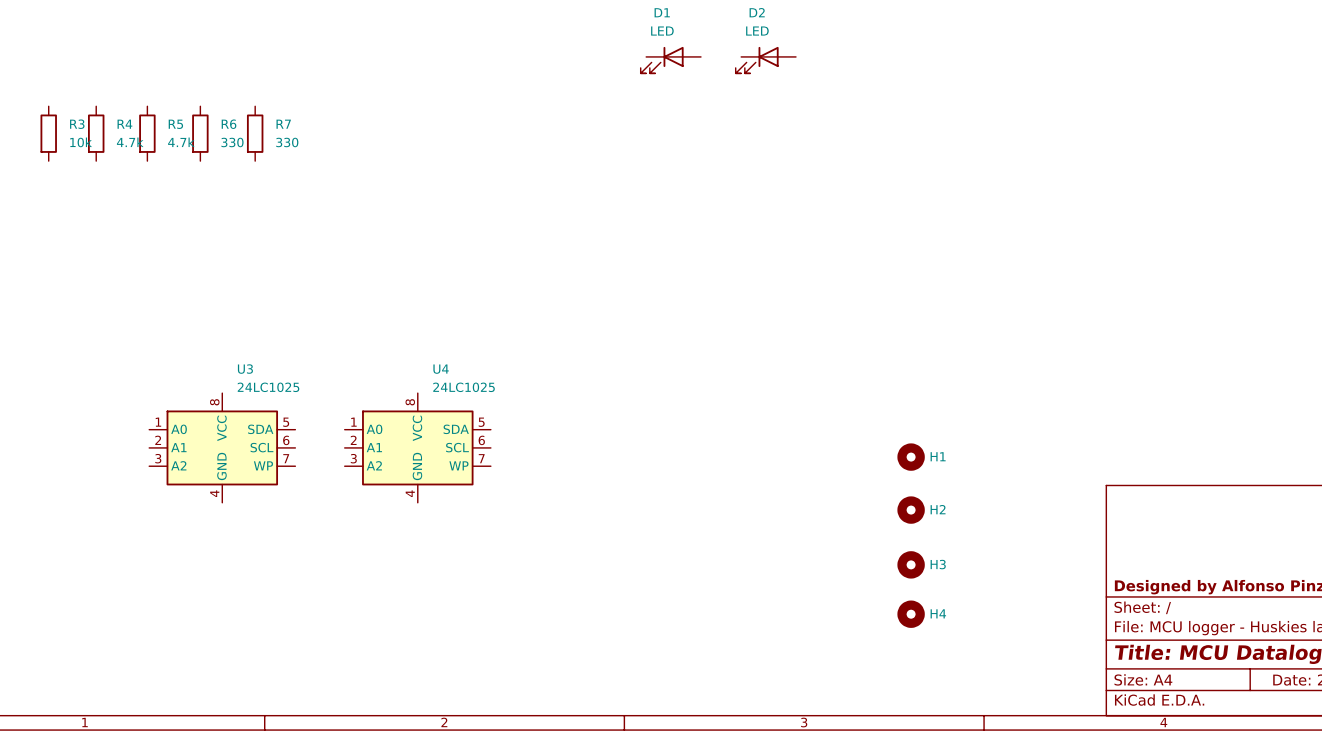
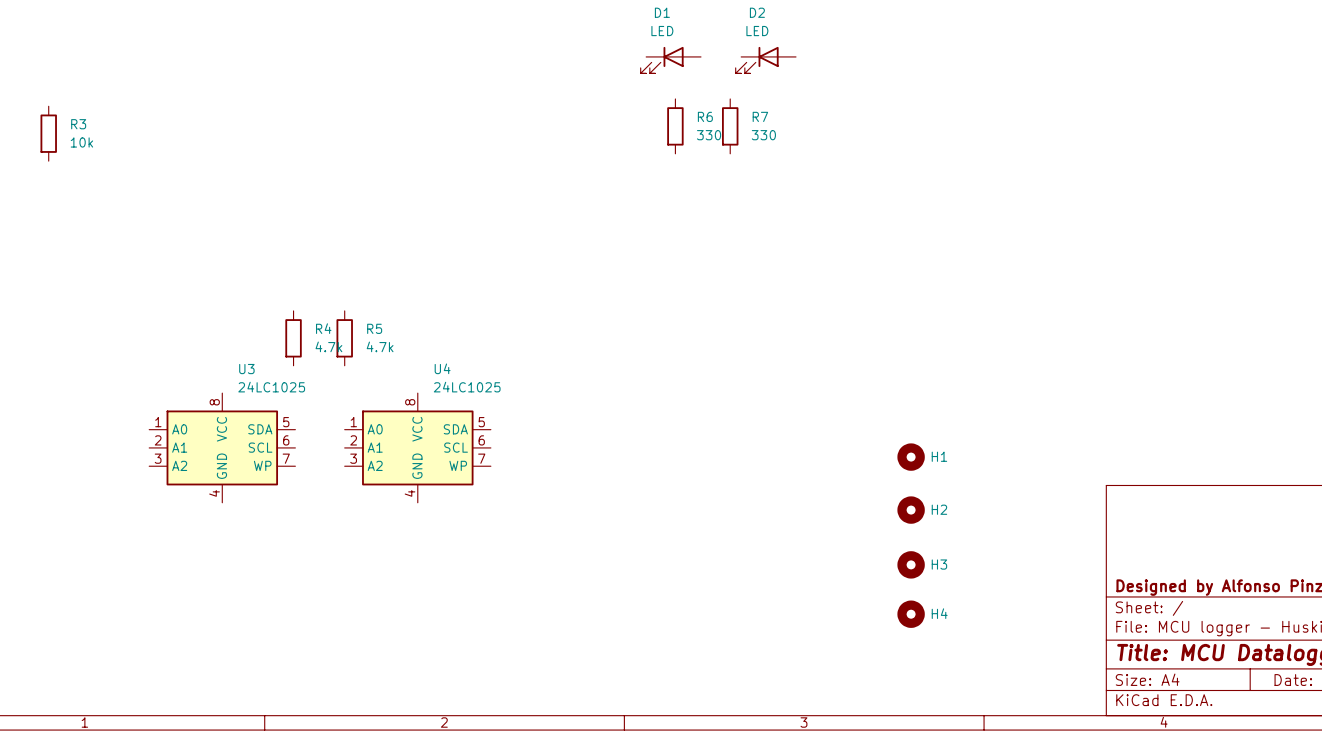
R4 position: (96, 133) -> (293, 338)
R5 position: (147, 133) -> (344, 338)
R6 position: (200, 133) -> (675, 126)
R7 position: (255, 133) -> (730, 126)

